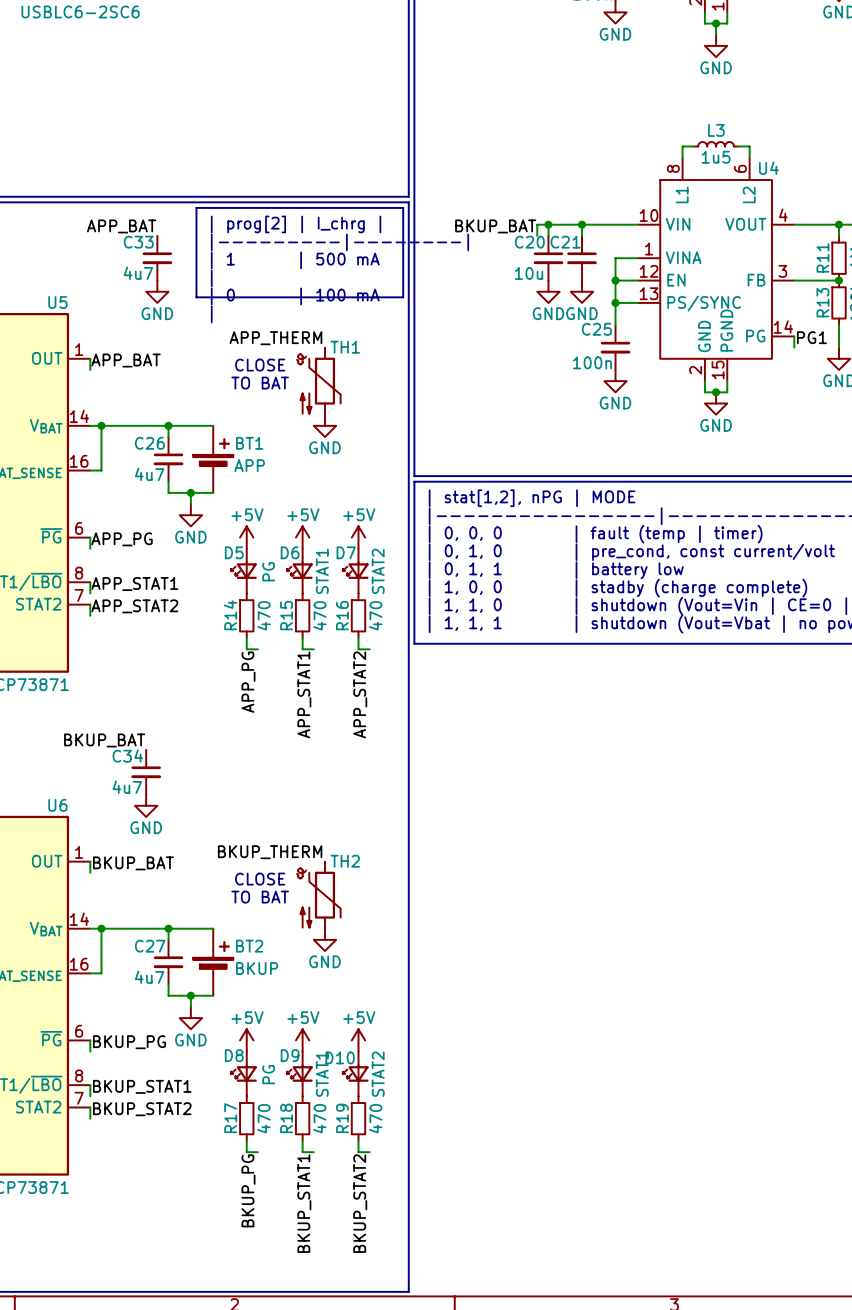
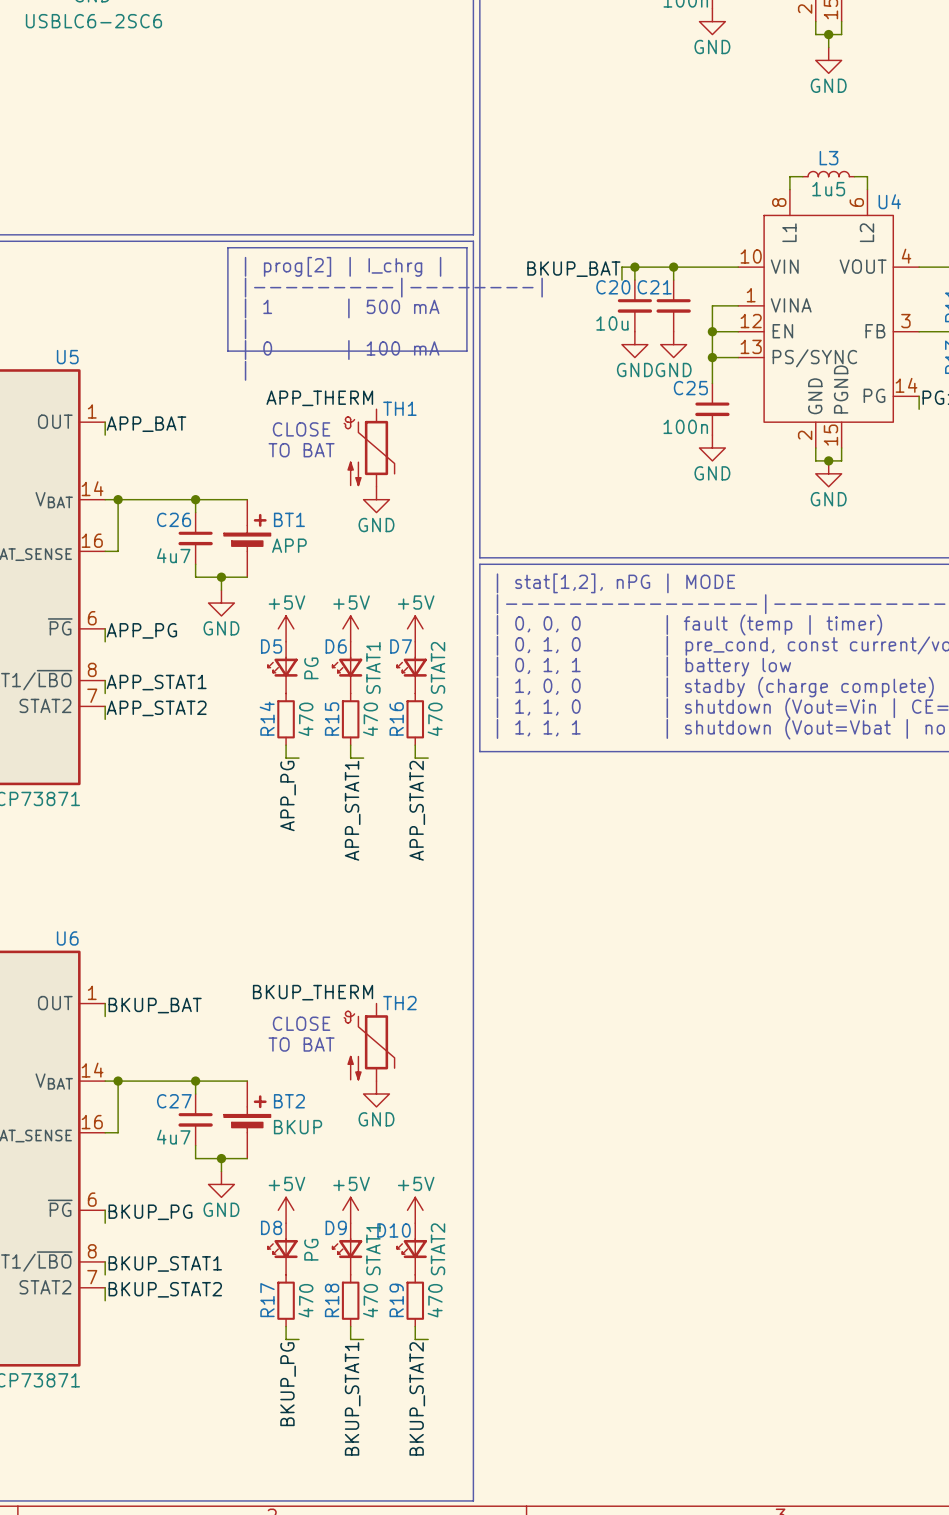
label: APP_BAT (121, 226) -> none
C33: 4u7 (157, 258) -> none
power symbol: GND (157, 291) -> none
label: BKUP_BAT (104, 740) -> none
C34: 4u7 (146, 772) -> none
power symbol: GND (146, 805) -> none

